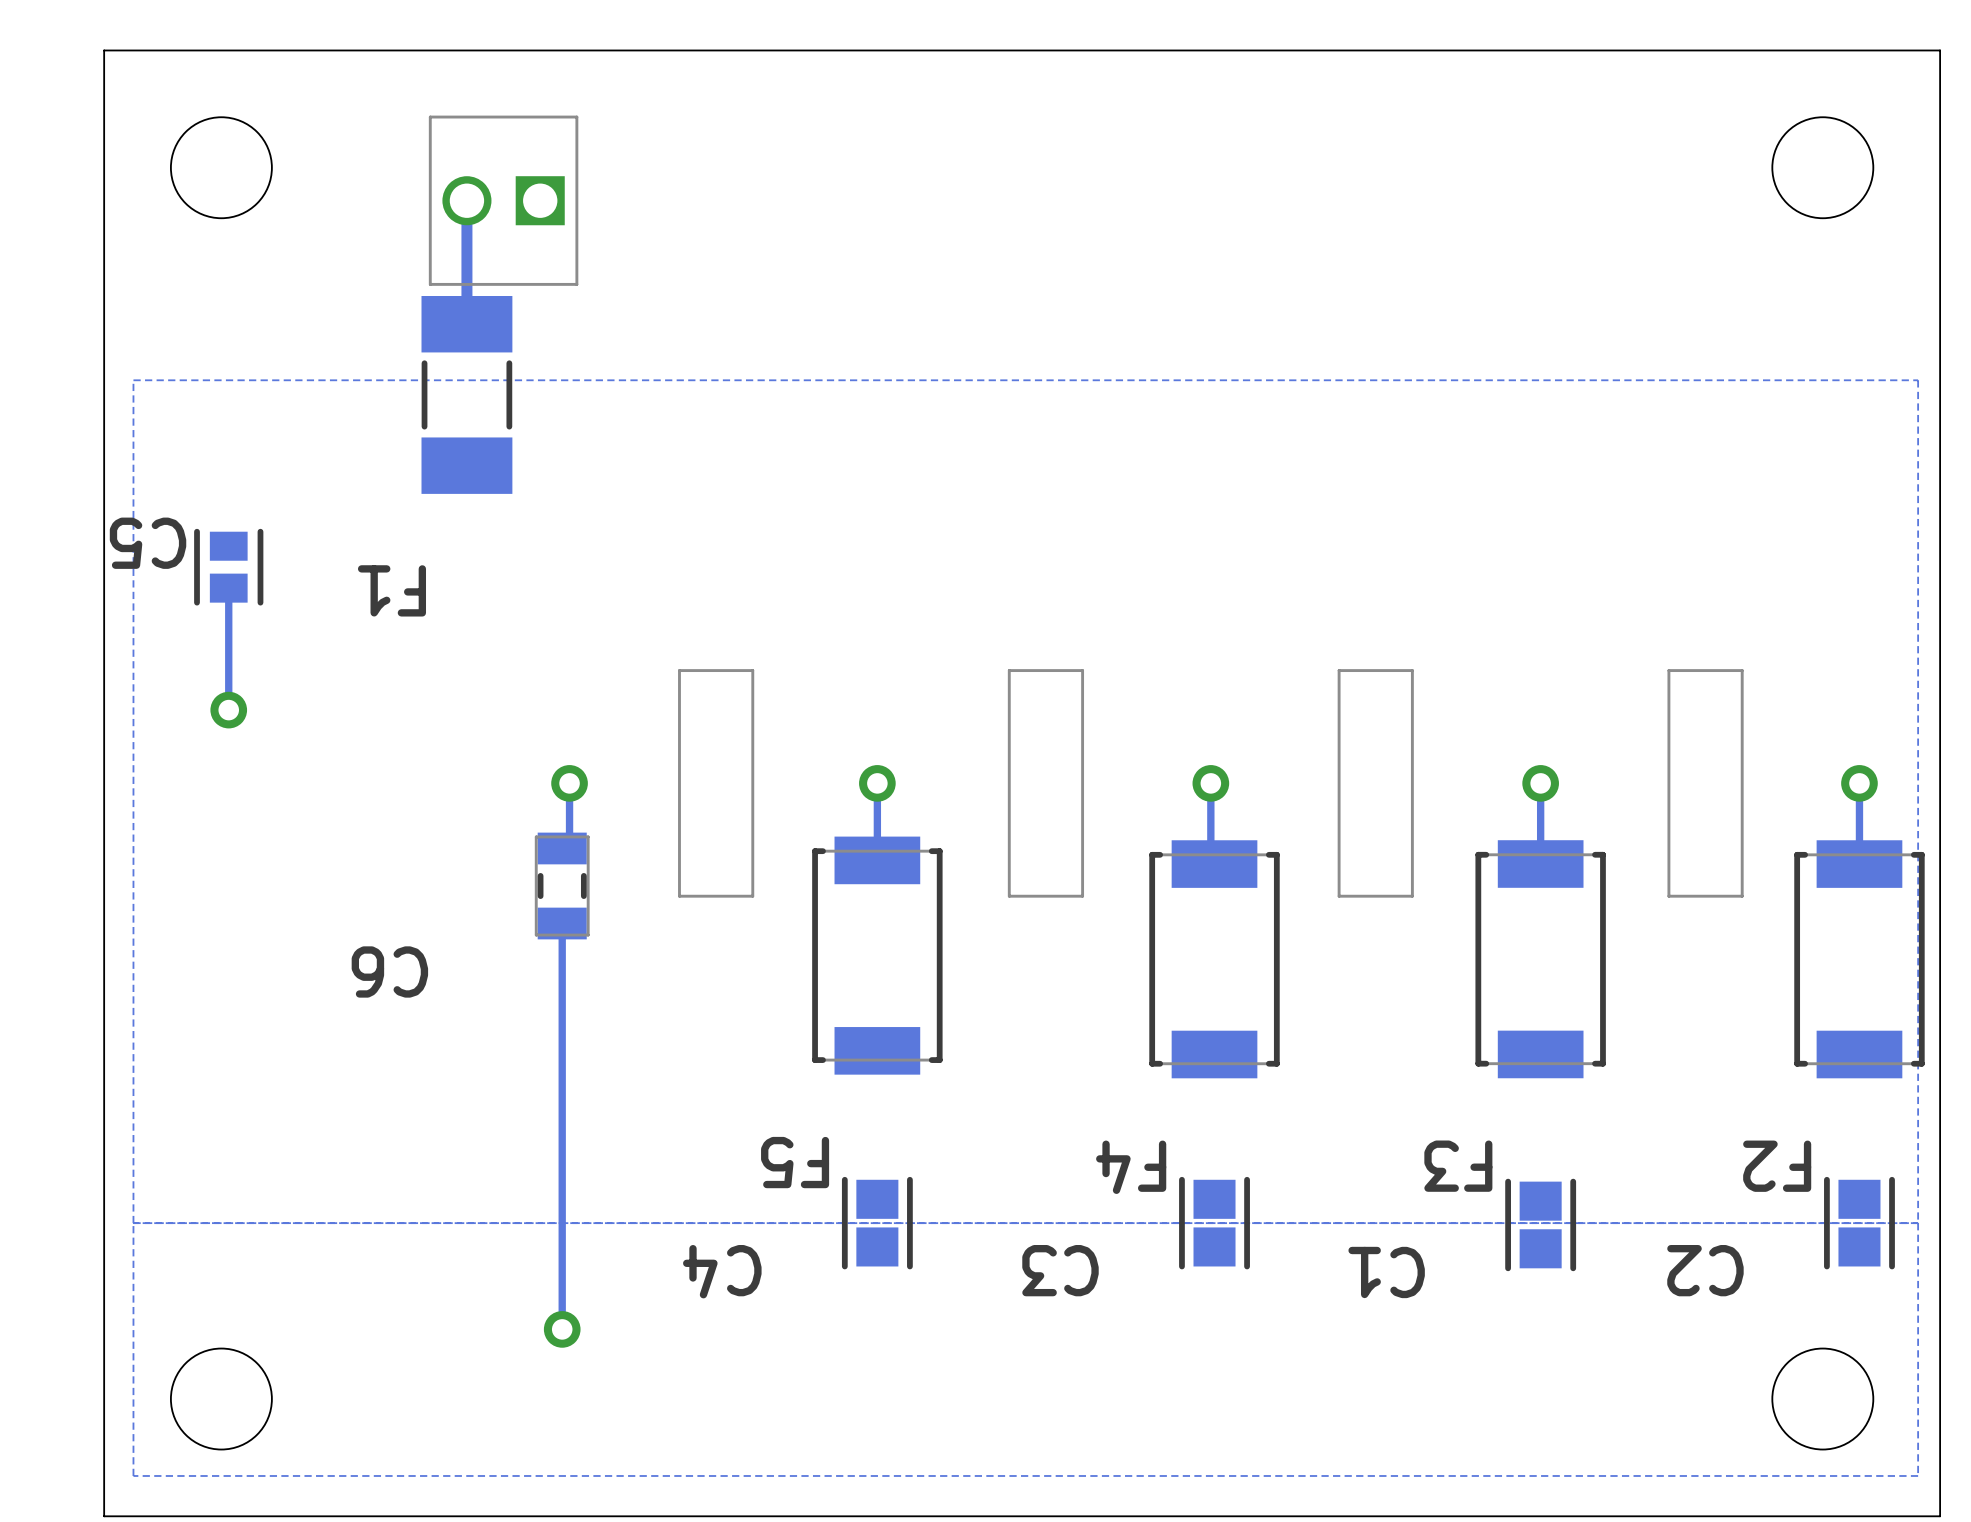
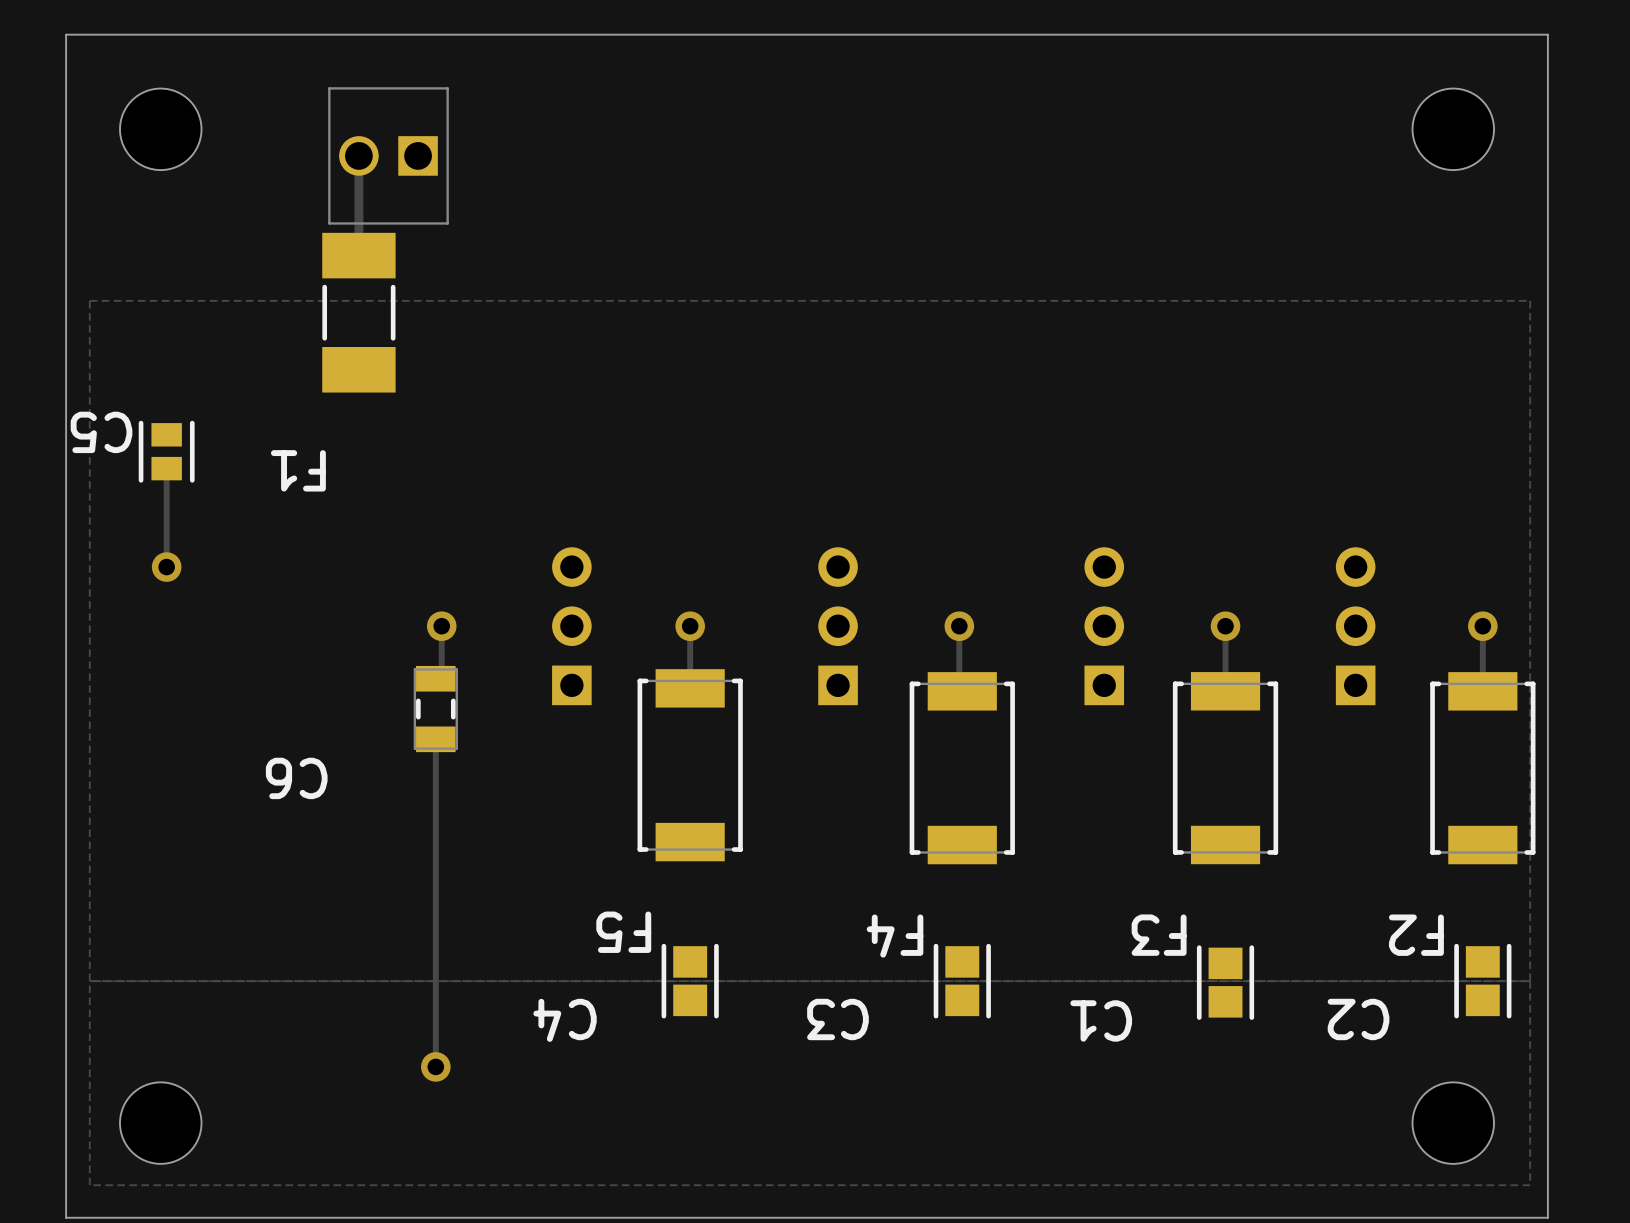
part footprint: [678, 669, 755, 898] -> [552, 547, 592, 706]
part footprint: [1007, 669, 1085, 898] -> [818, 547, 858, 706]
part footprint: [1337, 669, 1414, 898] -> [1084, 547, 1125, 706]
part footprint: [1667, 669, 1744, 898] -> [1335, 547, 1376, 706]

